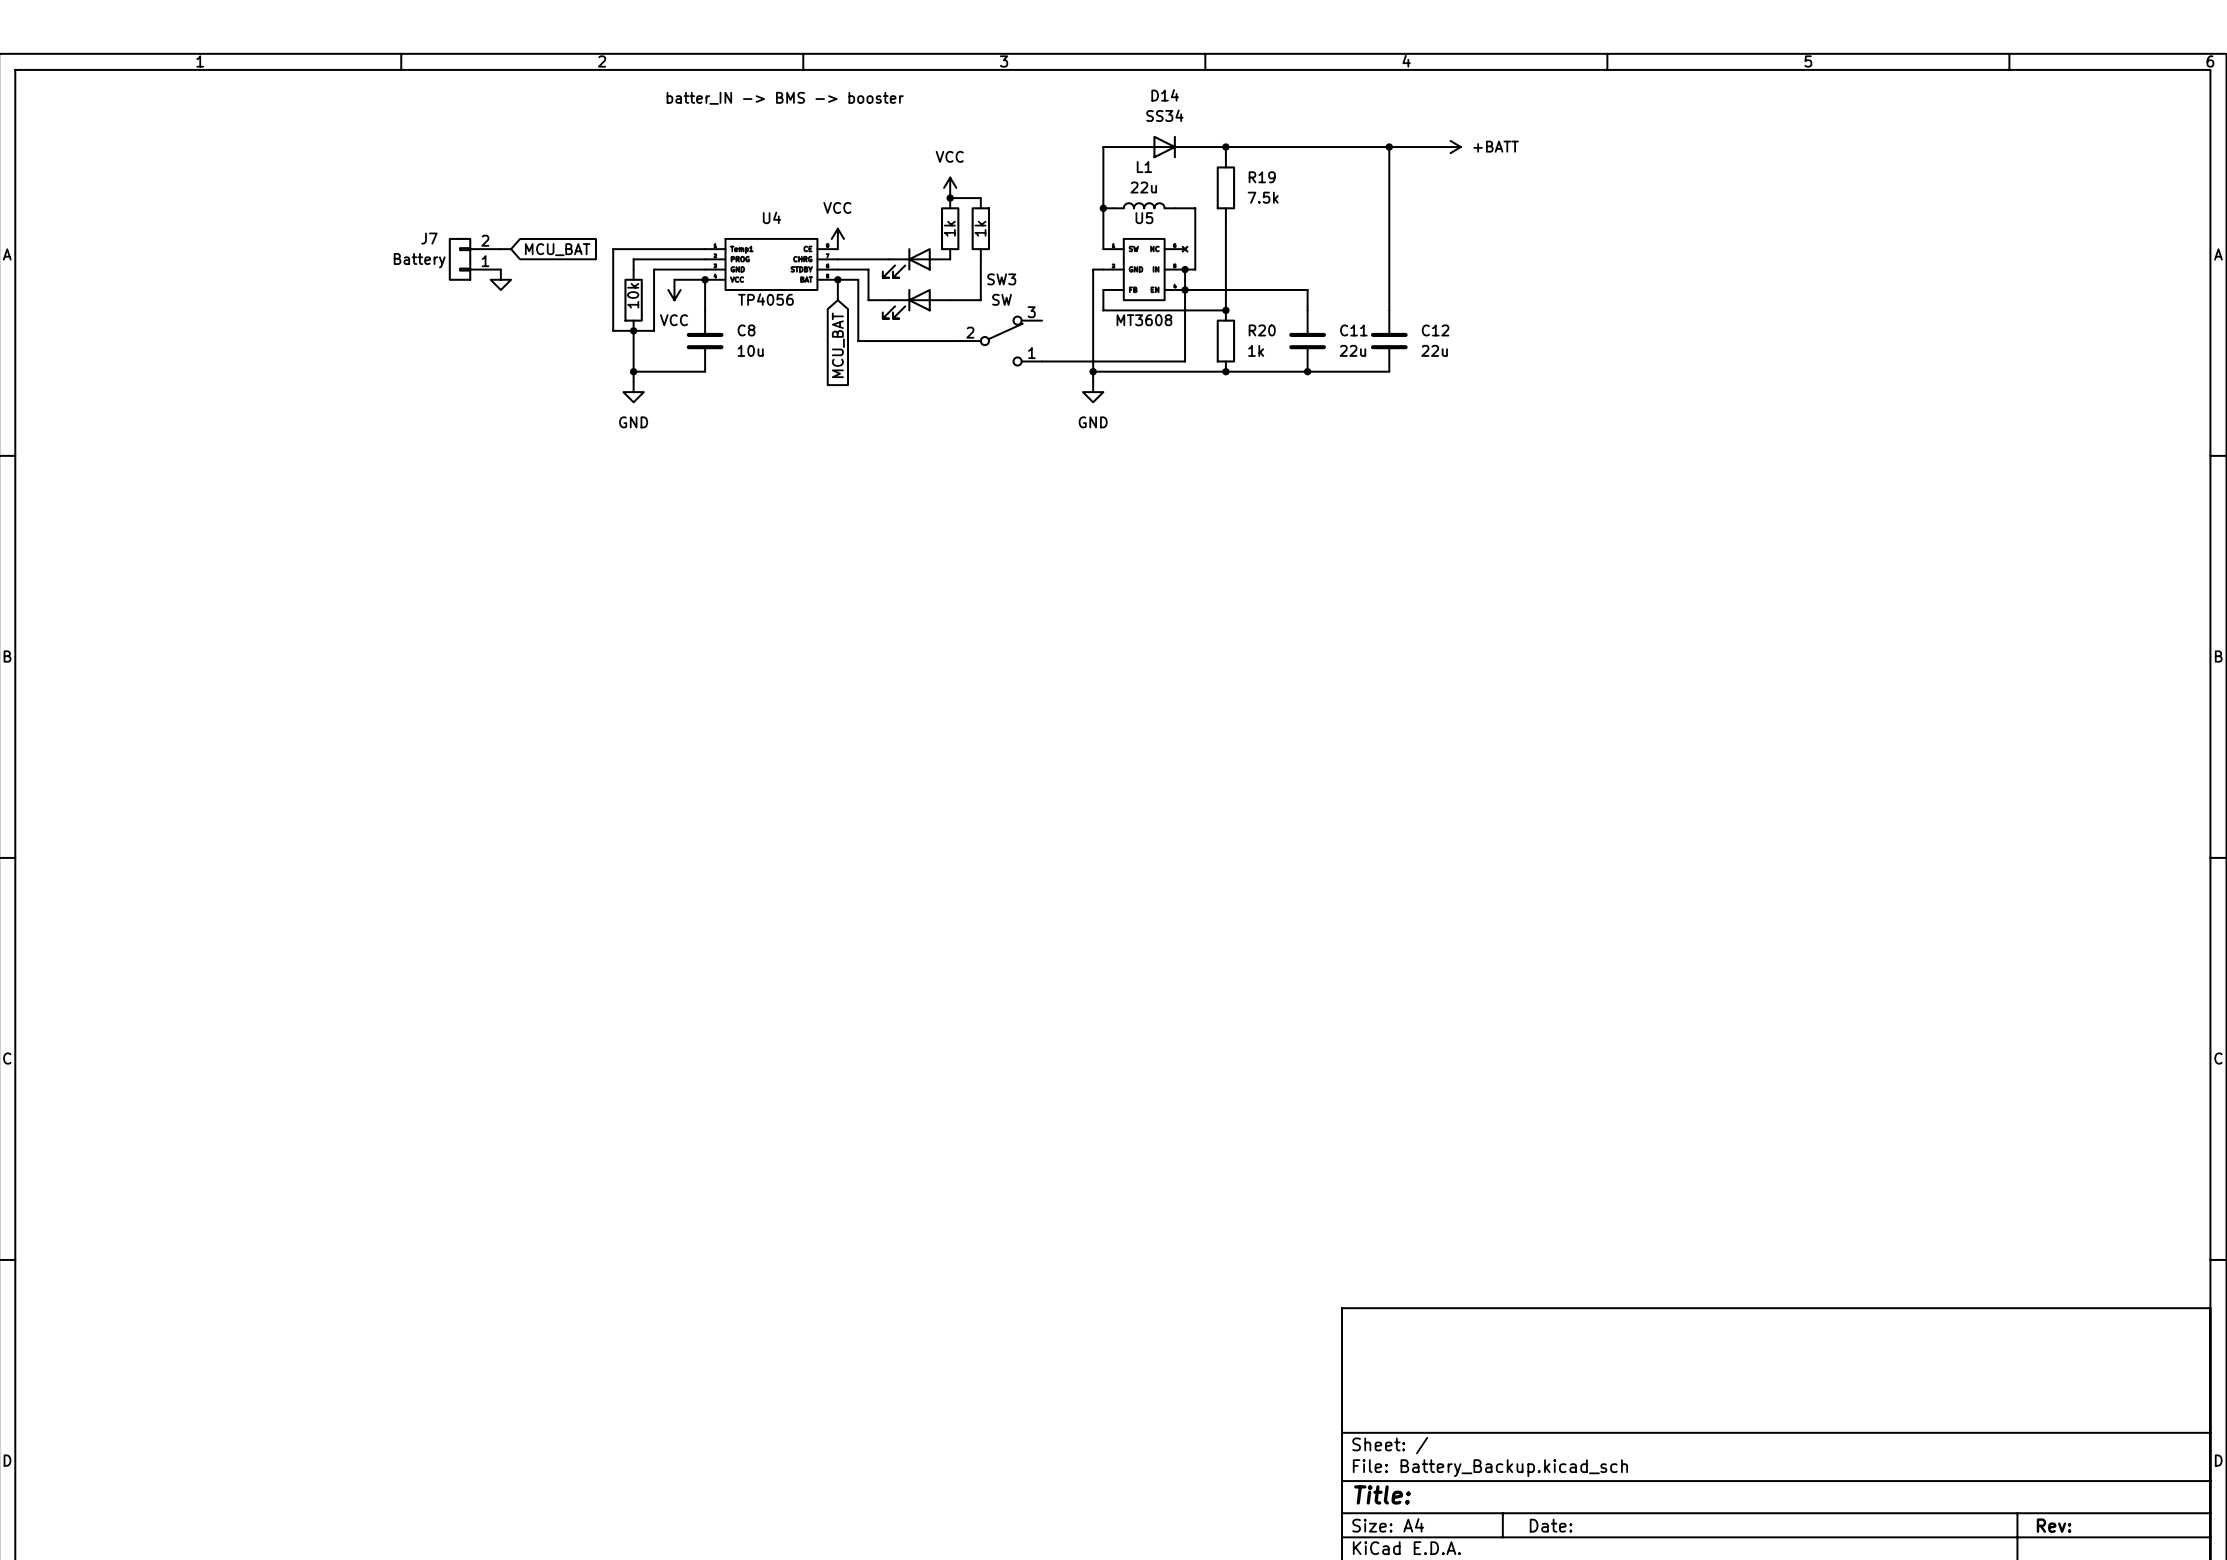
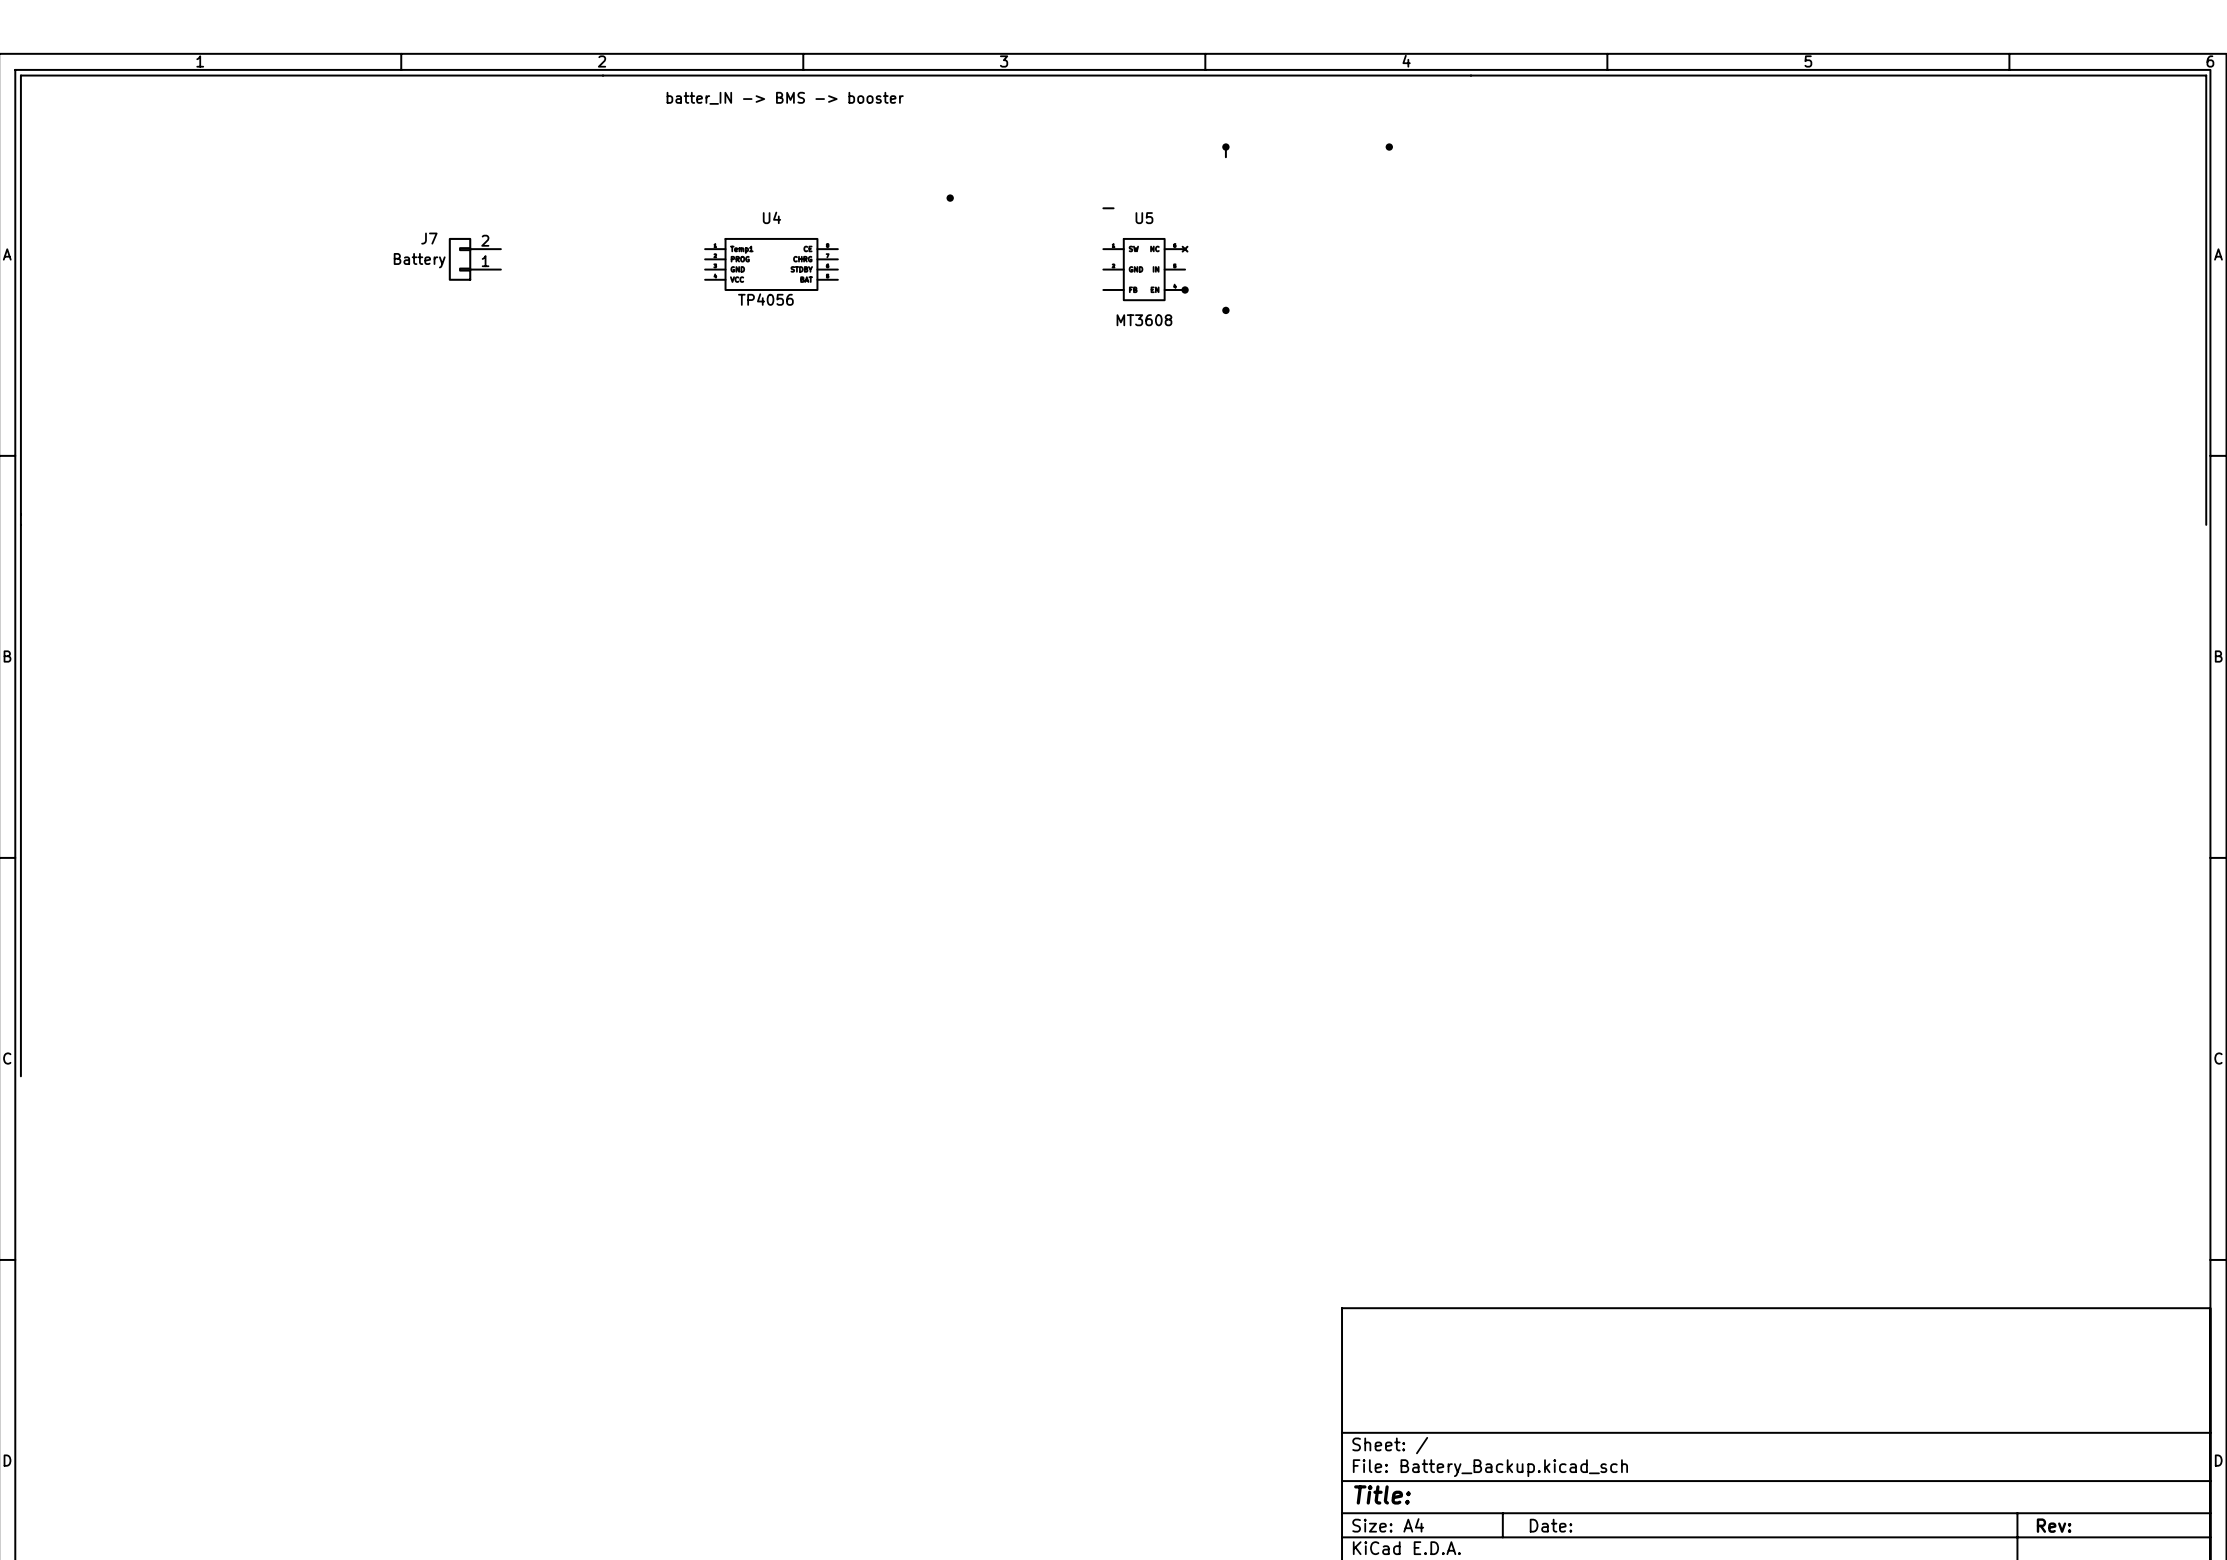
wire: (1134, 147) (1103, 147) (1103, 249) -> none
D14: SS34 (1164, 147) -> none
wire: (1195, 147) (1440, 147) -> none
wire: (1389, 147) (1389, 310) -> none
power symbol: +BATT (1450, 147) -> none
power symbol: VCC (950, 187) -> none
R19: 7.5k (1225, 187) -> none
wire: (950, 198) (980, 198) -> none
L1: 22u (1144, 205) -> none
junction: (1103, 208) -> none
wire: (1174, 208) (1195, 208) (1195, 269) (1185, 269) (1185, 361) (1042, 361) -> none
wire: (1225, 218) (1225, 310) (1103, 310) (1103, 289) -> none
part: 1k (950, 228) -> none
part: 1k (980, 228) -> none
power symbol: VCC (837, 238) -> none
wire: (500, 249) (511, 249) -> none
global label: MCU_BAT (557, 249) -> none
wire: (705, 249) (613, 249) (613, 330) (654, 330) (654, 269) (705, 269) -> none
wire: (705, 259) (633, 259) (633, 269) -> none
wire: (837, 259) (888, 259) -> none
wire: (980, 259) (980, 300) (950, 300) -> none
part: (916, 262) -> none
wire: (837, 269) (868, 269) (868, 300) (888, 300) -> none
wire: (1103, 269) (1093, 269) (1093, 381) -> none
junction: (1185, 269) -> none
power symbol: (500, 279) -> none
wire: (674, 279) (705, 279) (705, 310) -> none
junction: (705, 279) -> none
junction: (837, 279) -> none
power symbol: VCC (674, 289) -> none
wire: (1185, 289) (1307, 289) (1307, 310) -> none
part: 10k (633, 300) -> none
wire: (837, 300) (837, 279) (858, 279) (858, 341) (960, 341) -> none
part: (916, 303) -> none
wire: (633, 330) (633, 381) -> none
junction: (633, 330) -> none
C8: 10u (705, 341) -> none
SW3: SW (1001, 341) -> none
R20: 1k (1225, 341) -> none
C11: 22u (1307, 341) -> none
C12: 22u (1389, 341) -> none
global label: MCU_BAT (838, 345) -> none
wire: (633, 371) (705, 371) -> none
junction: (633, 371) -> none
wire: (1093, 371) (1389, 371) -> none
junction: (1093, 371) -> none
junction: (1225, 371) -> none
junction: (1307, 371) -> none
power symbol: GND (633, 392) -> none
power symbol: GND (1093, 392) -> none
line: none -> (2206, 524) (2206, 75) (20, 75) (20, 1076)

